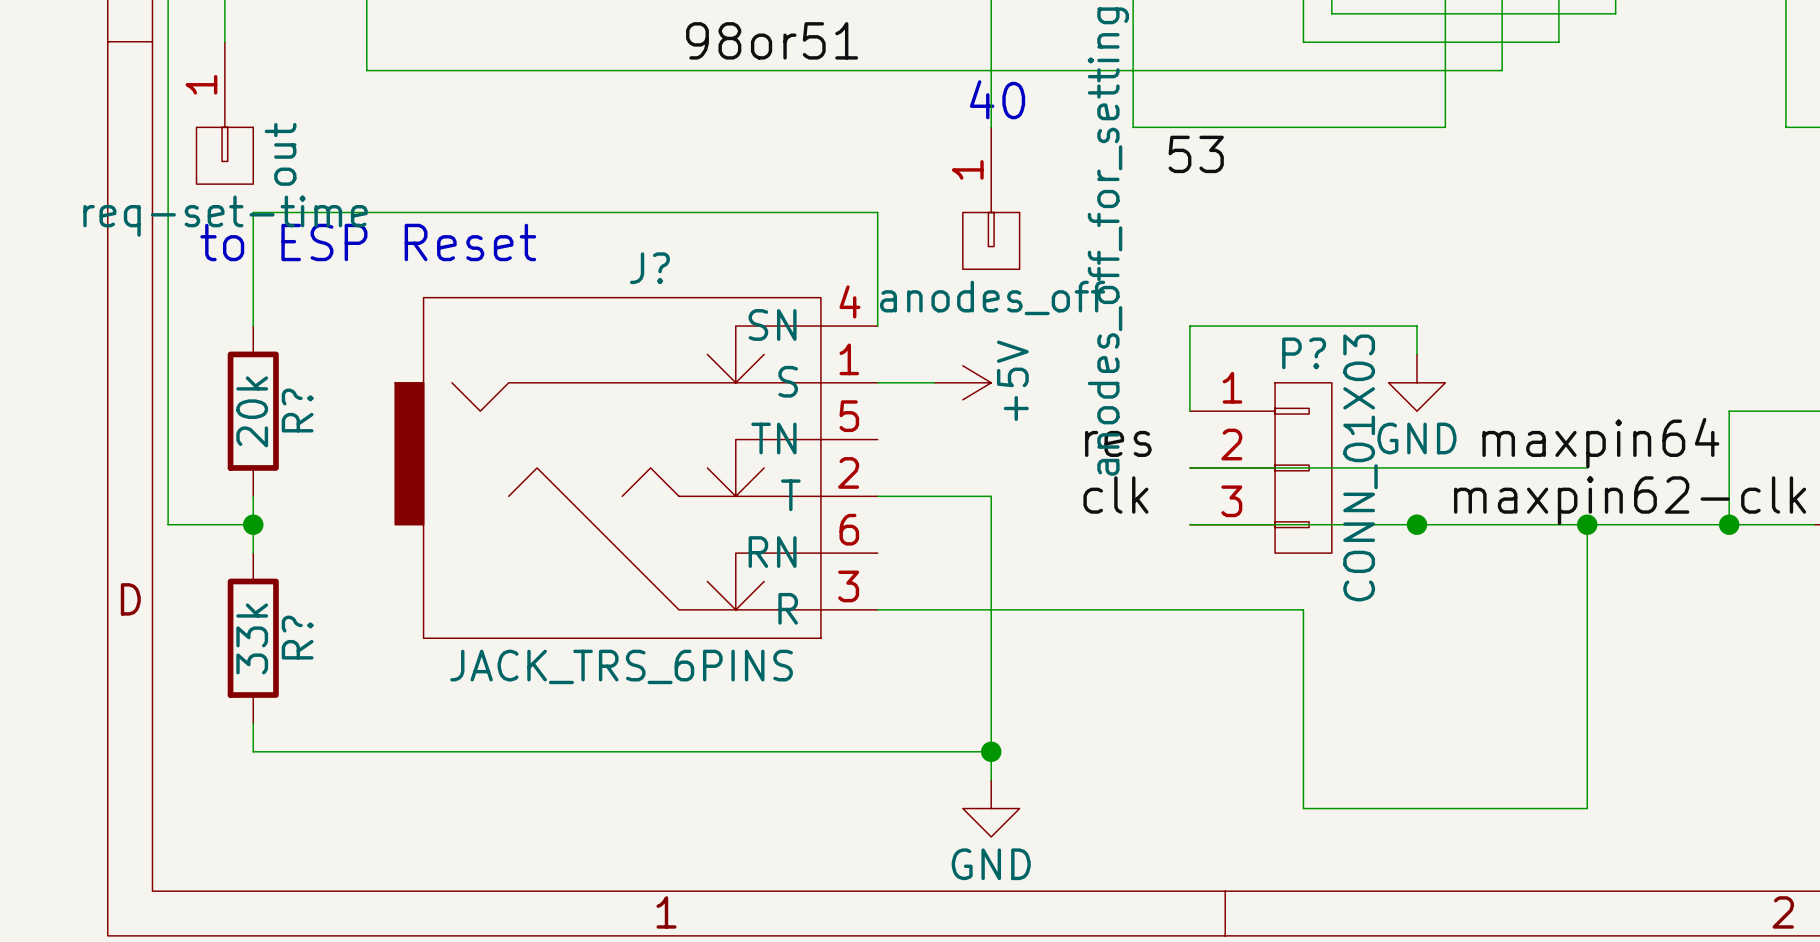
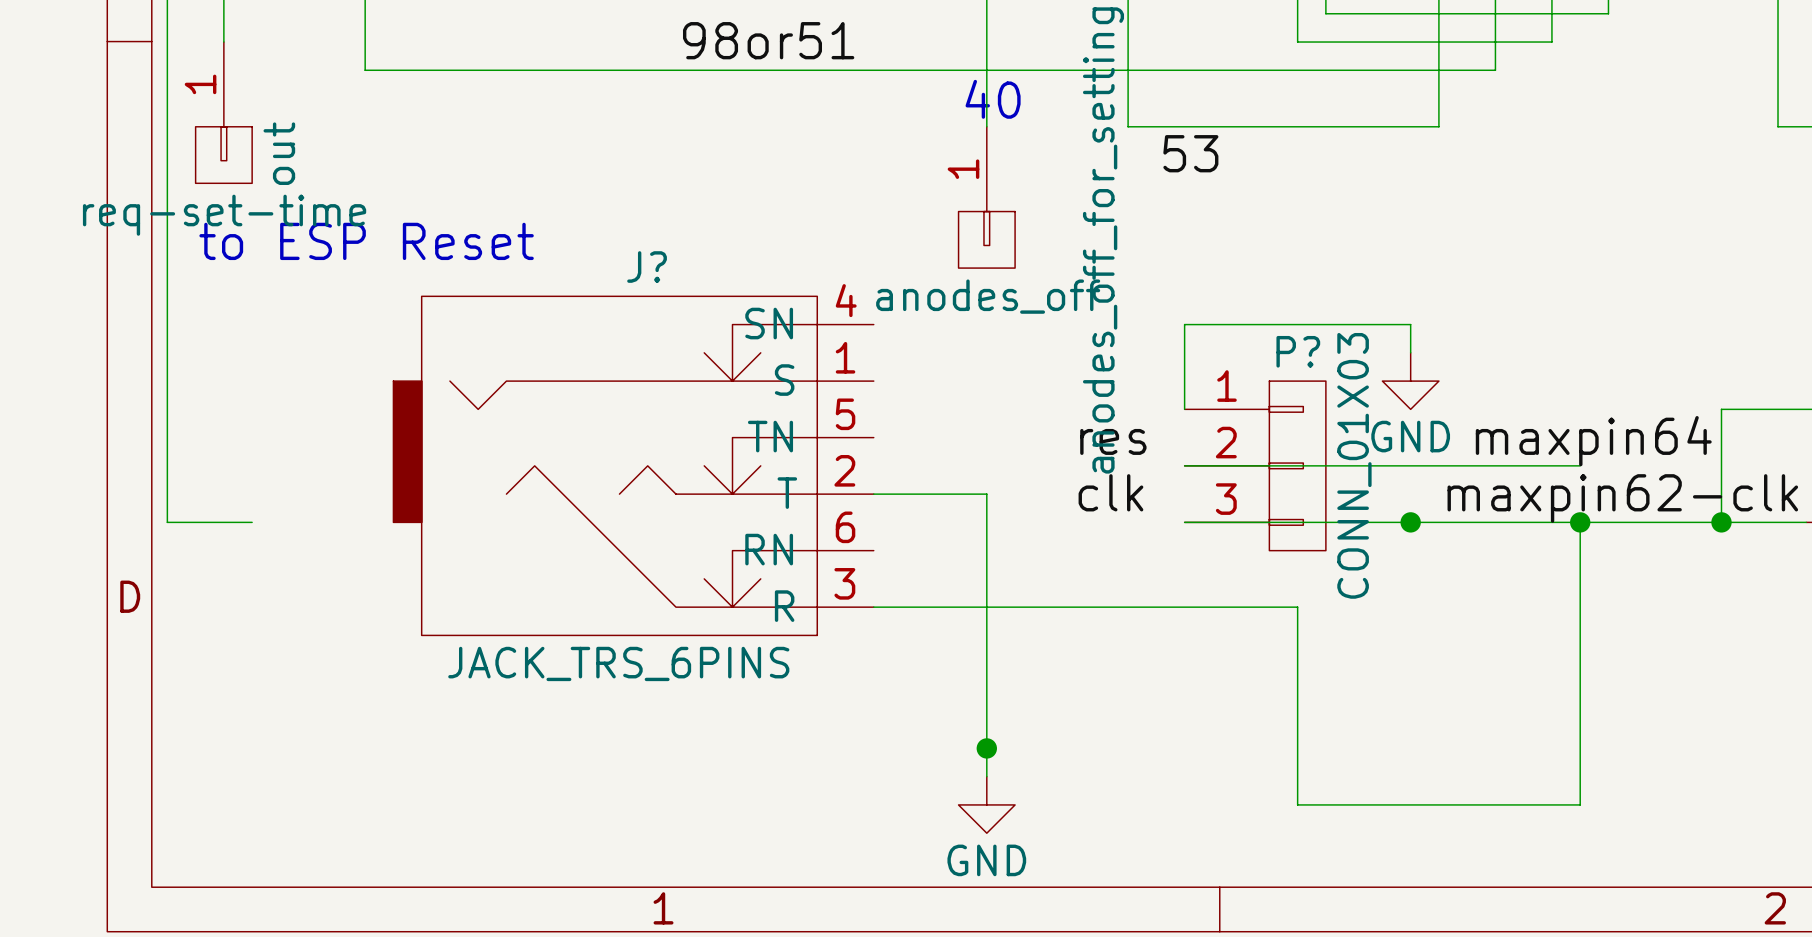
wire: (253, 326) (253, 212) (877, 212) (877, 326) -> none
wire: (877, 382) (934, 382) -> none
power symbol: +5V (962, 382) -> none
R?: 20k (253, 411) -> none
wire: (253, 496) (253, 553) -> none
junction: (253, 524) -> none
R?: 33k (253, 638) -> none
wire: (253, 723) (253, 751) (991, 751) -> none

